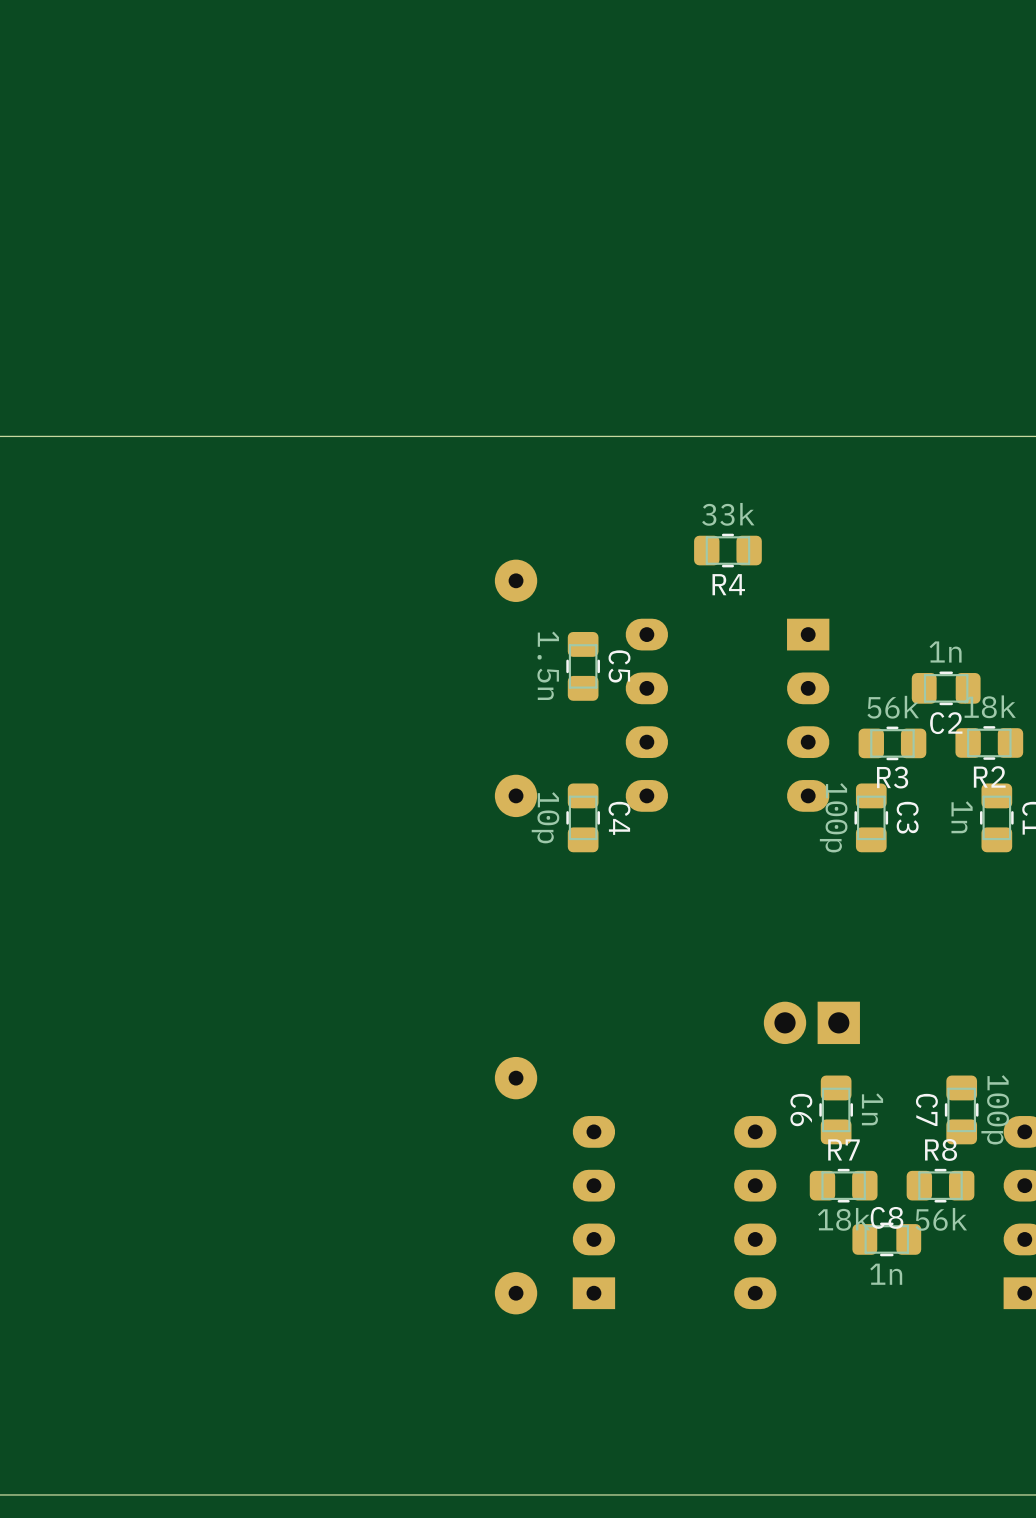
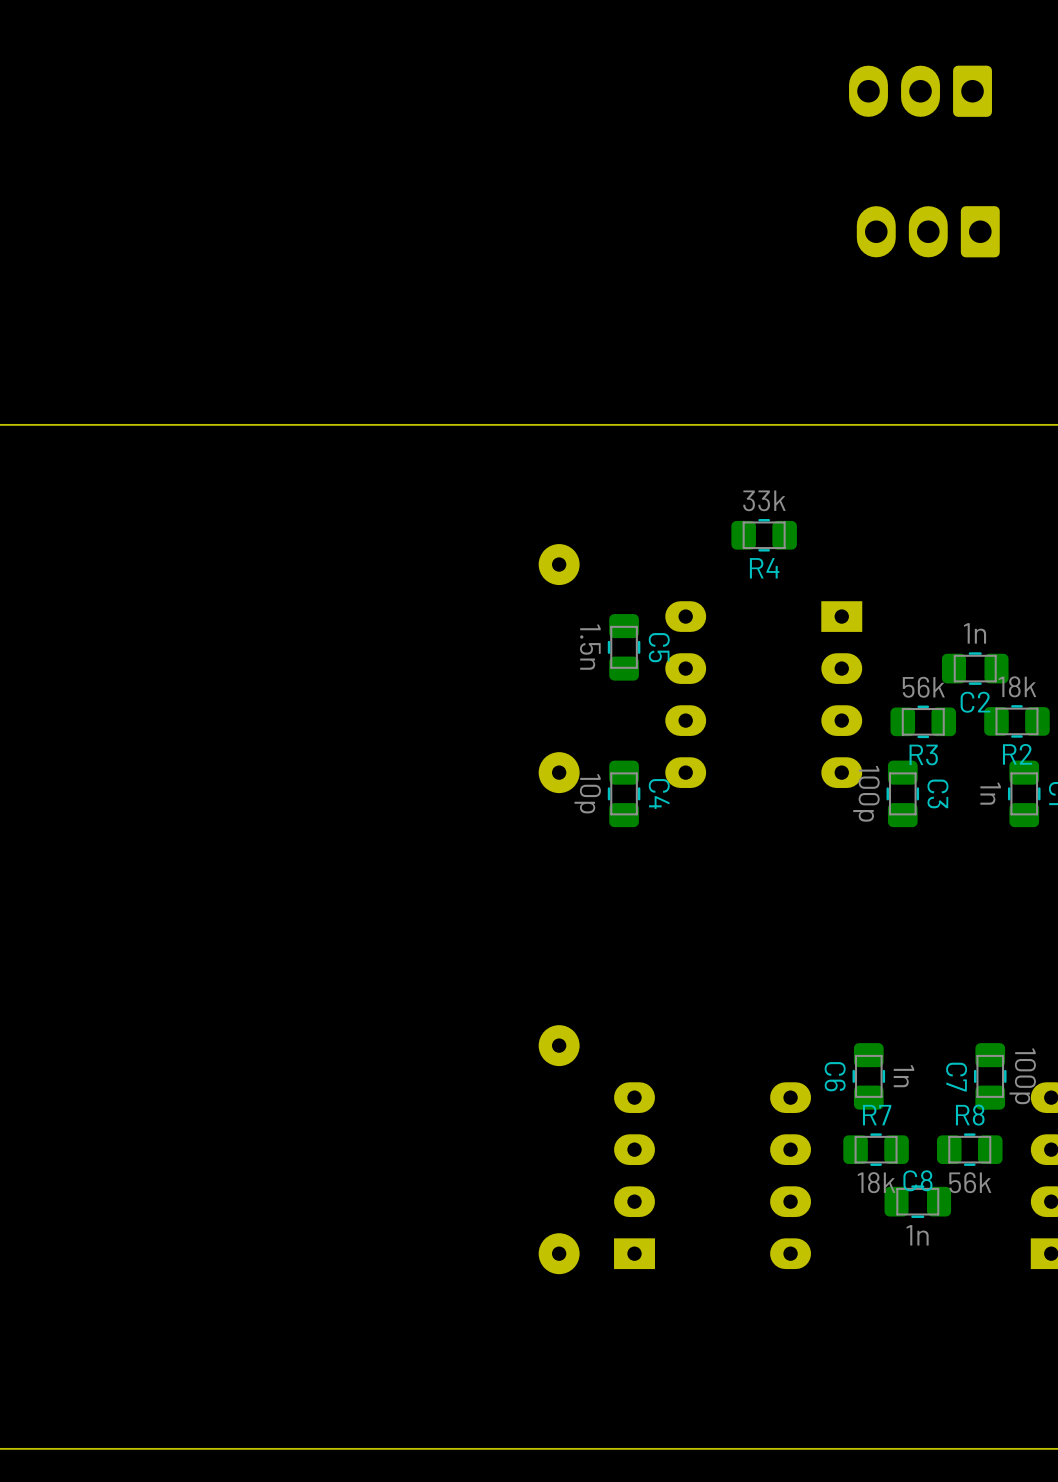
part: none -> (920, 91)
part: none -> (928, 231)
part: (811, 1022) -> none

